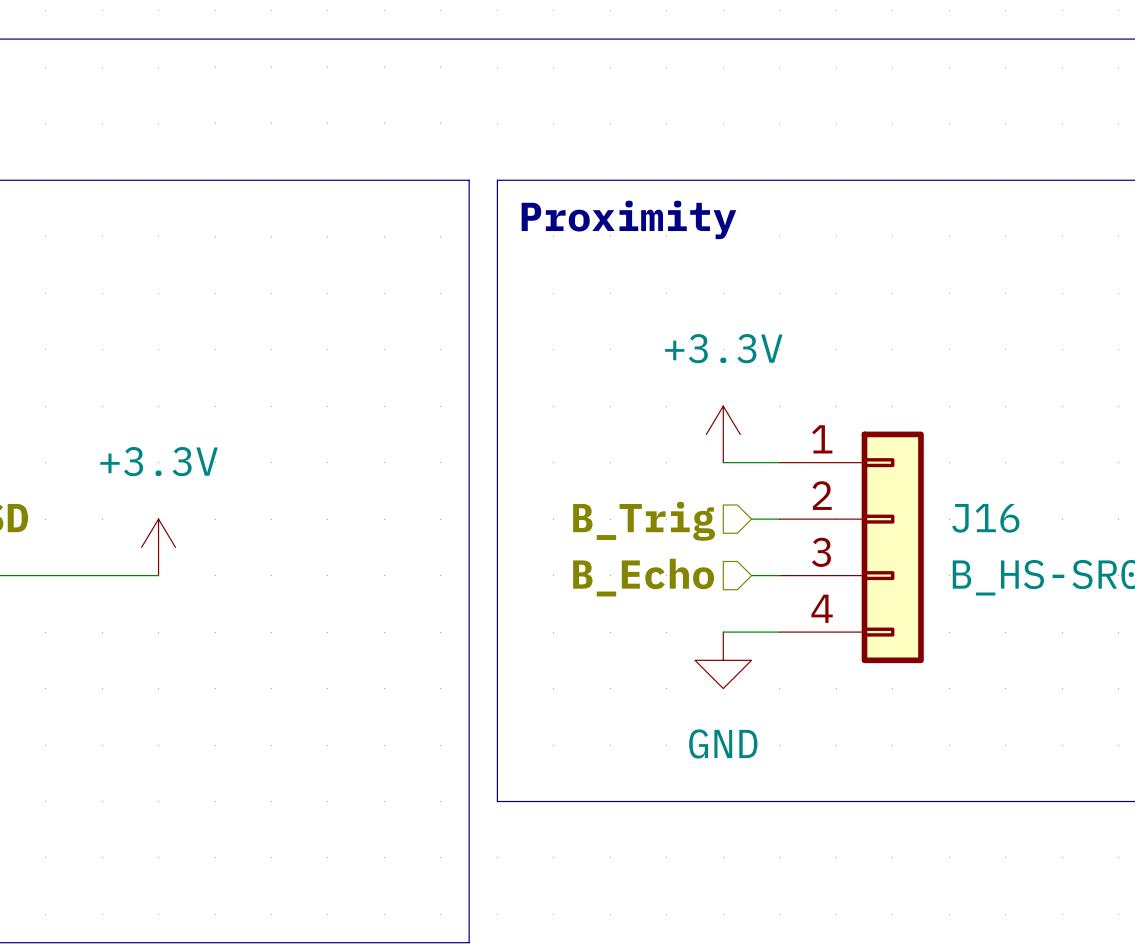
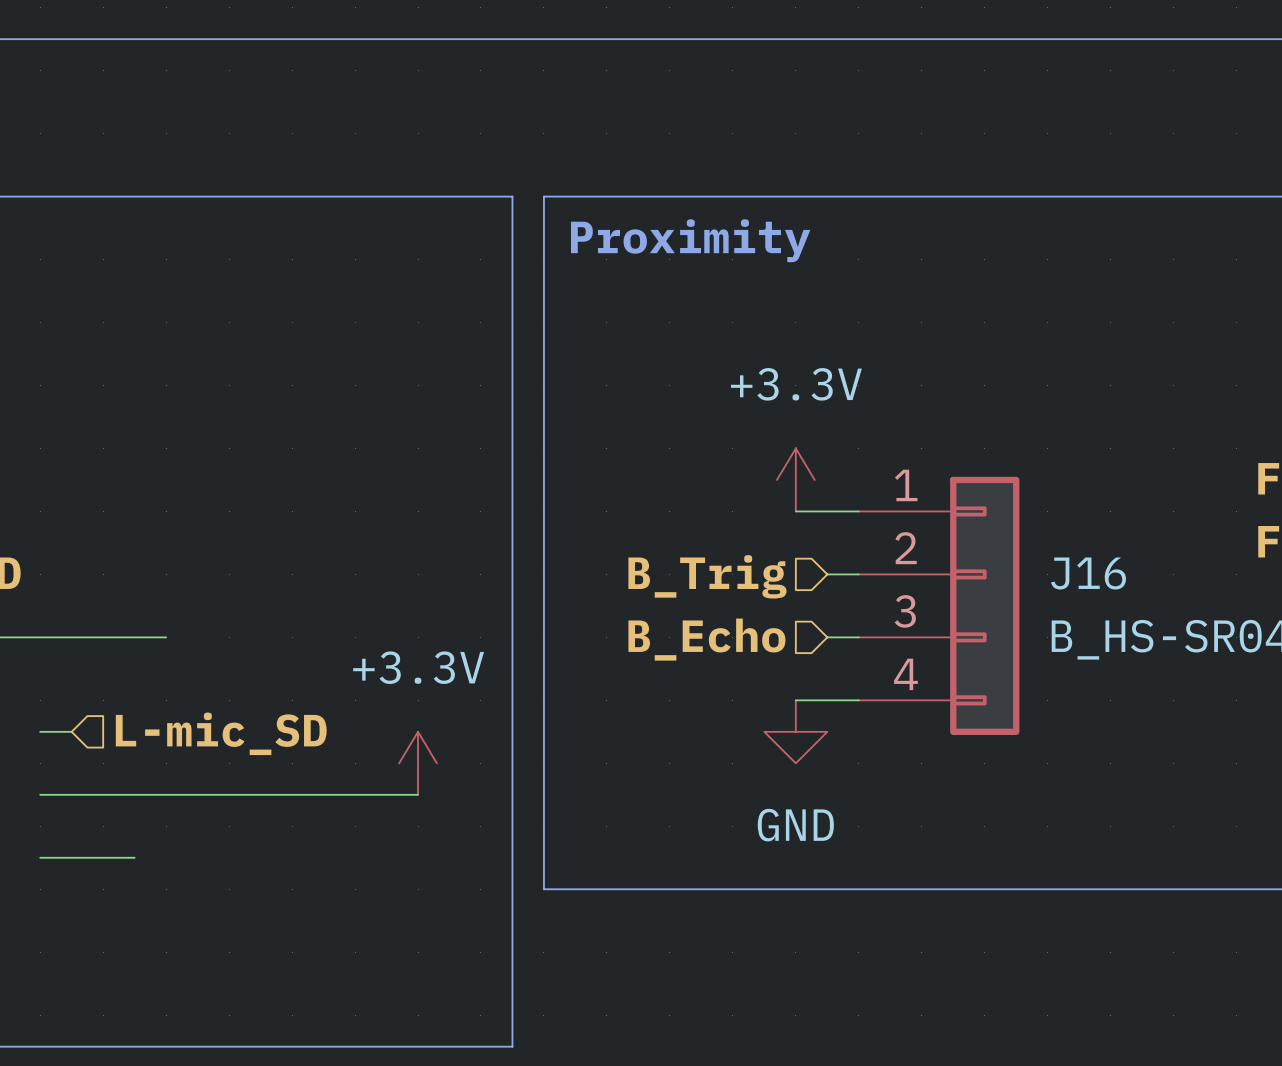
power symbol position: +3.3V (158, 547) -> +3.3V (418, 763)
wire: none -> (40, 731) (71, 731)
hierarchical label: none -> L-mic_SD (221, 733)
wire: none -> (40, 794) (418, 794)
wire: none -> (40, 857) (134, 857)

